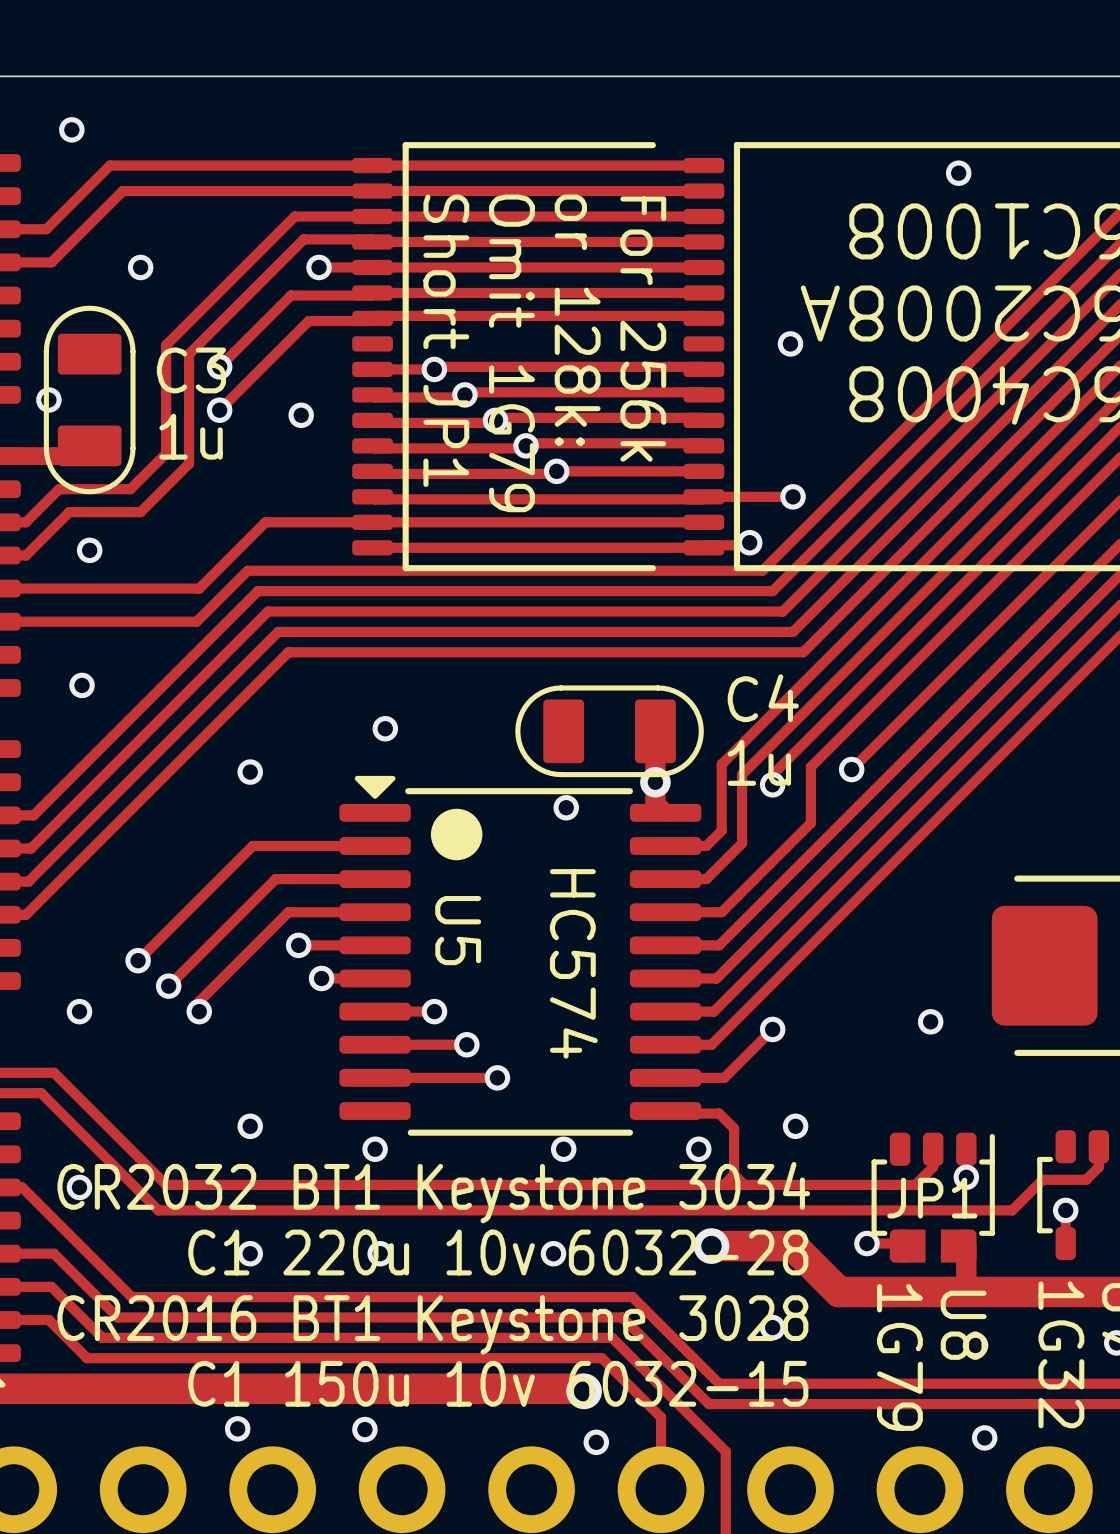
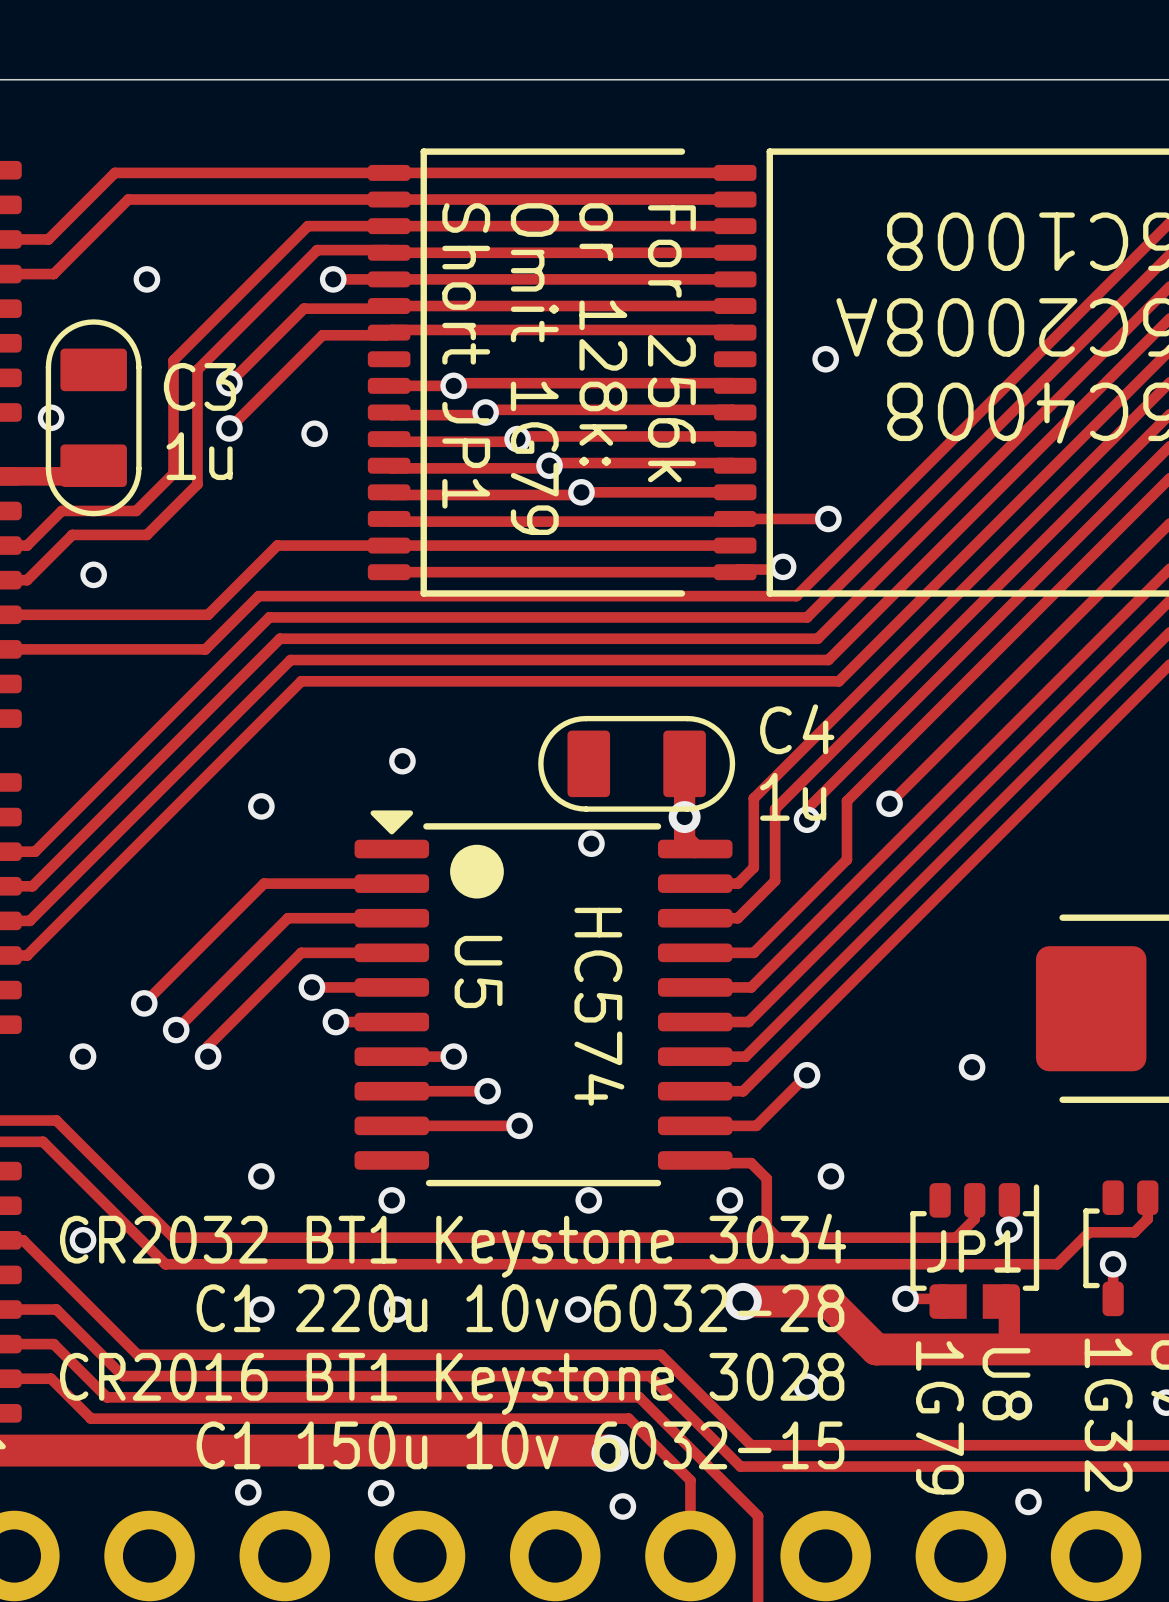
via: (71, 129) -> none
via: (958, 173) -> none
via: (82, 685) -> none

